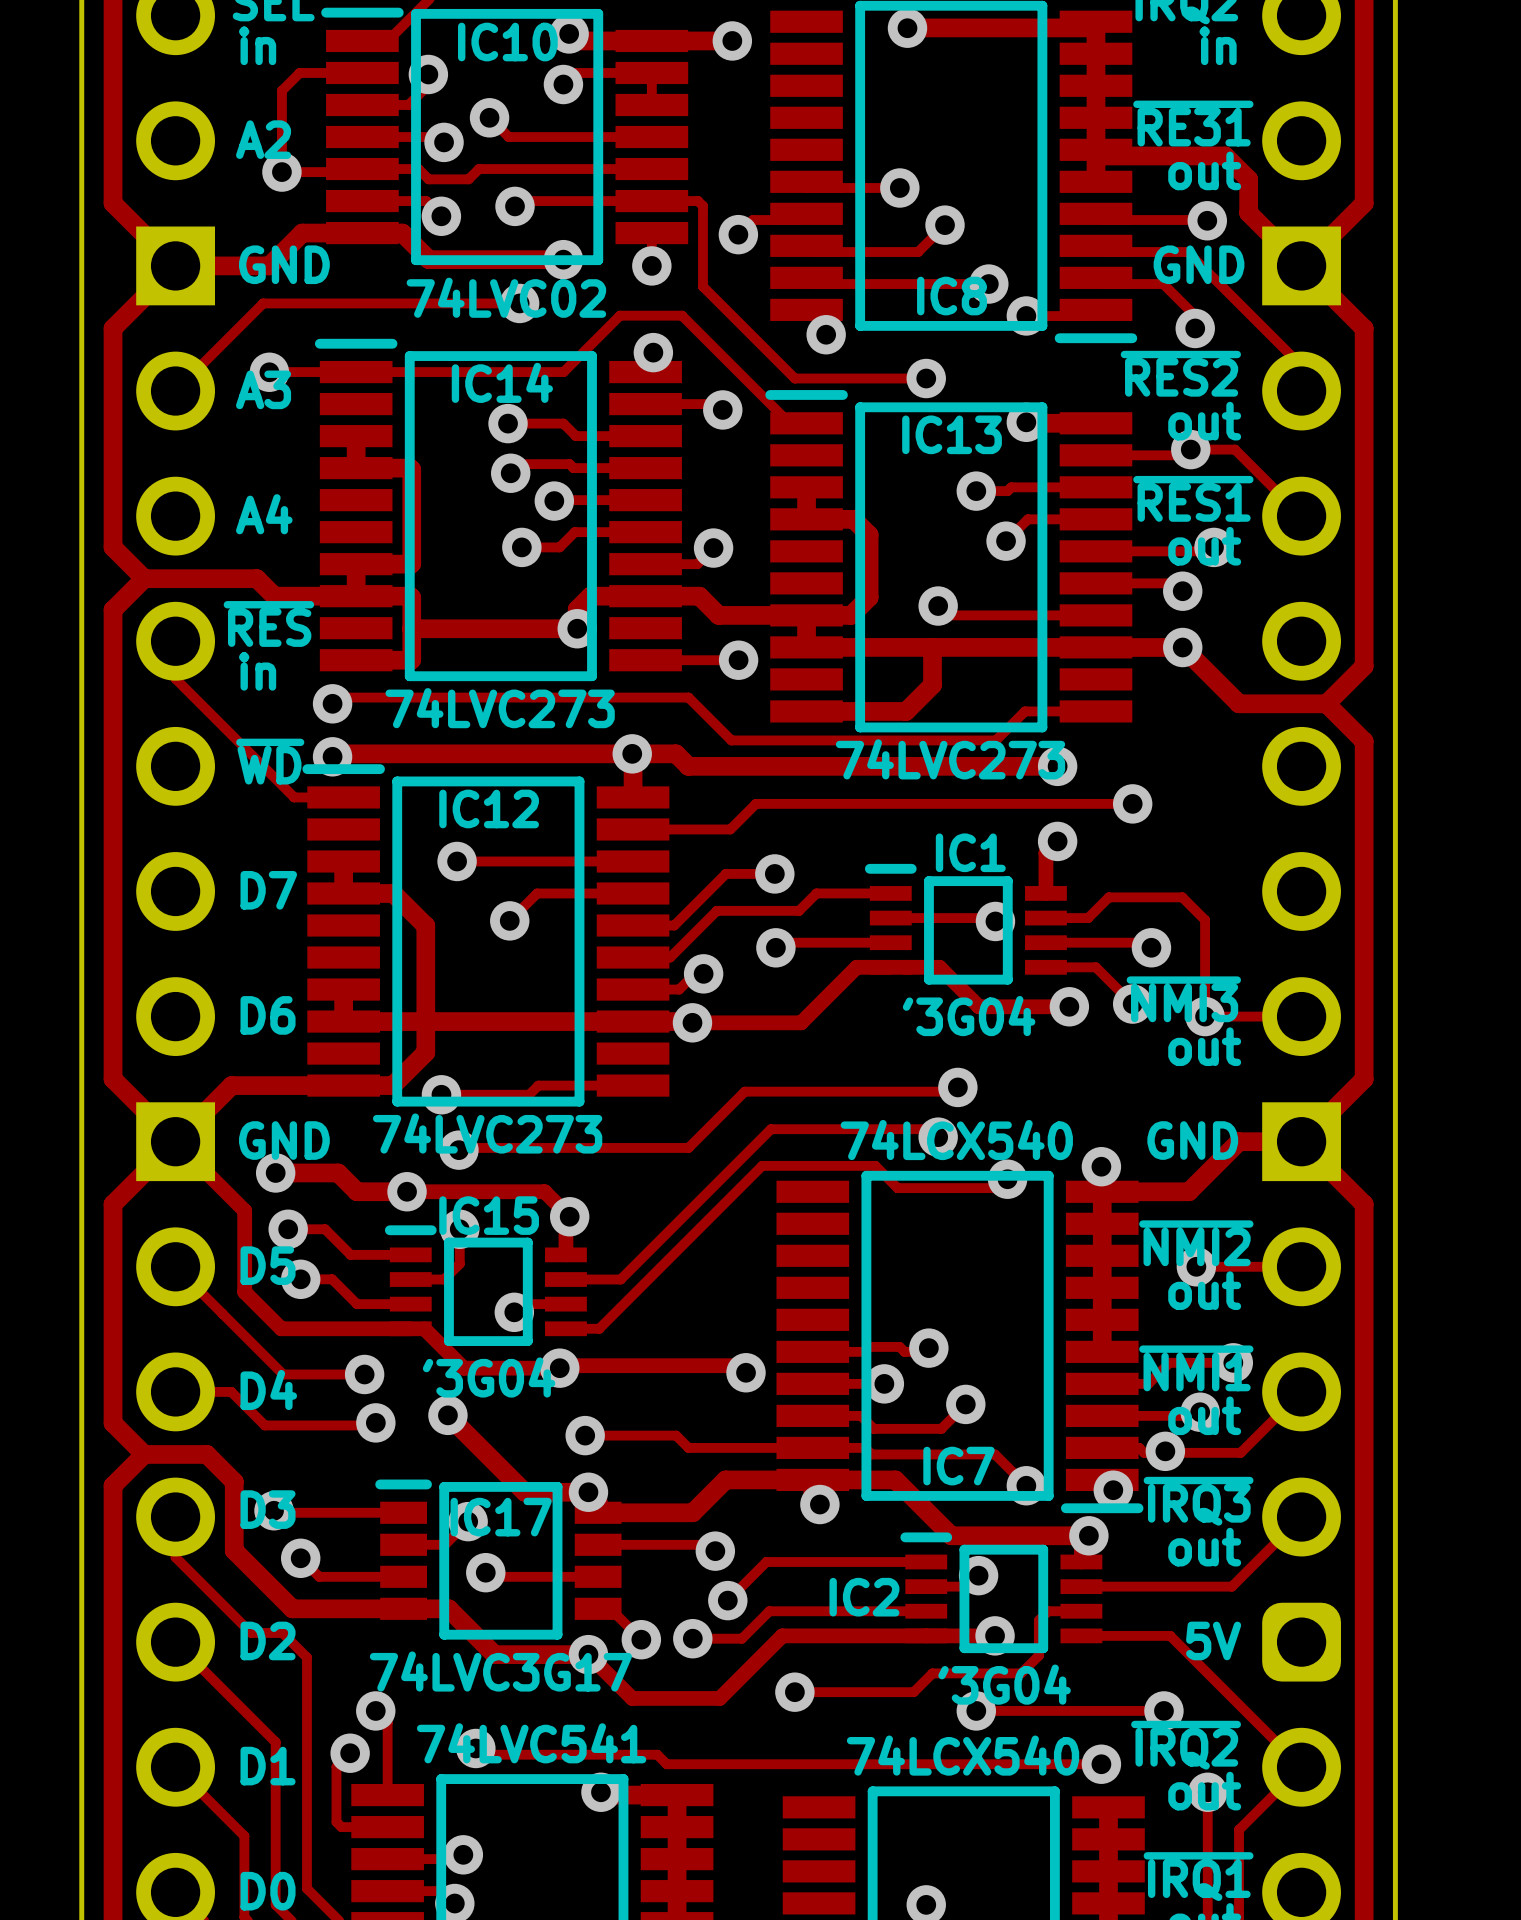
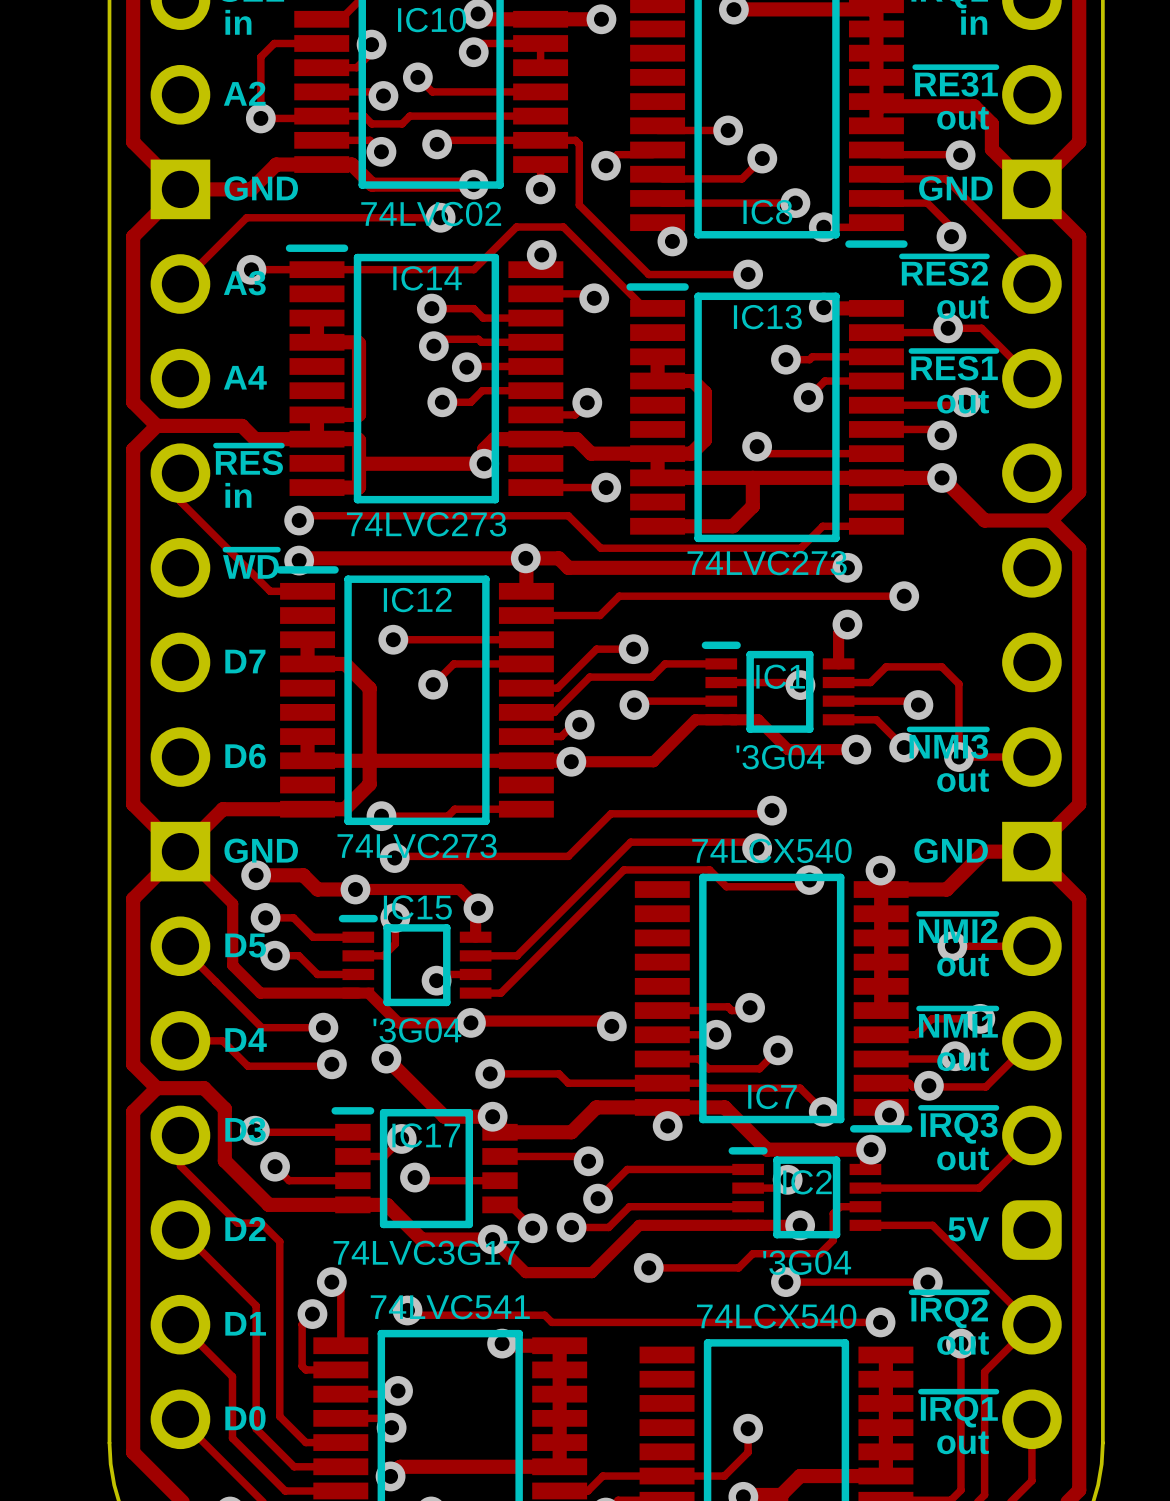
IC1 name position: IC1 (970, 852) -> IC1 (780, 676)
IC2 name position: IC2 (864, 1597) -> IC2 (807, 1182)

